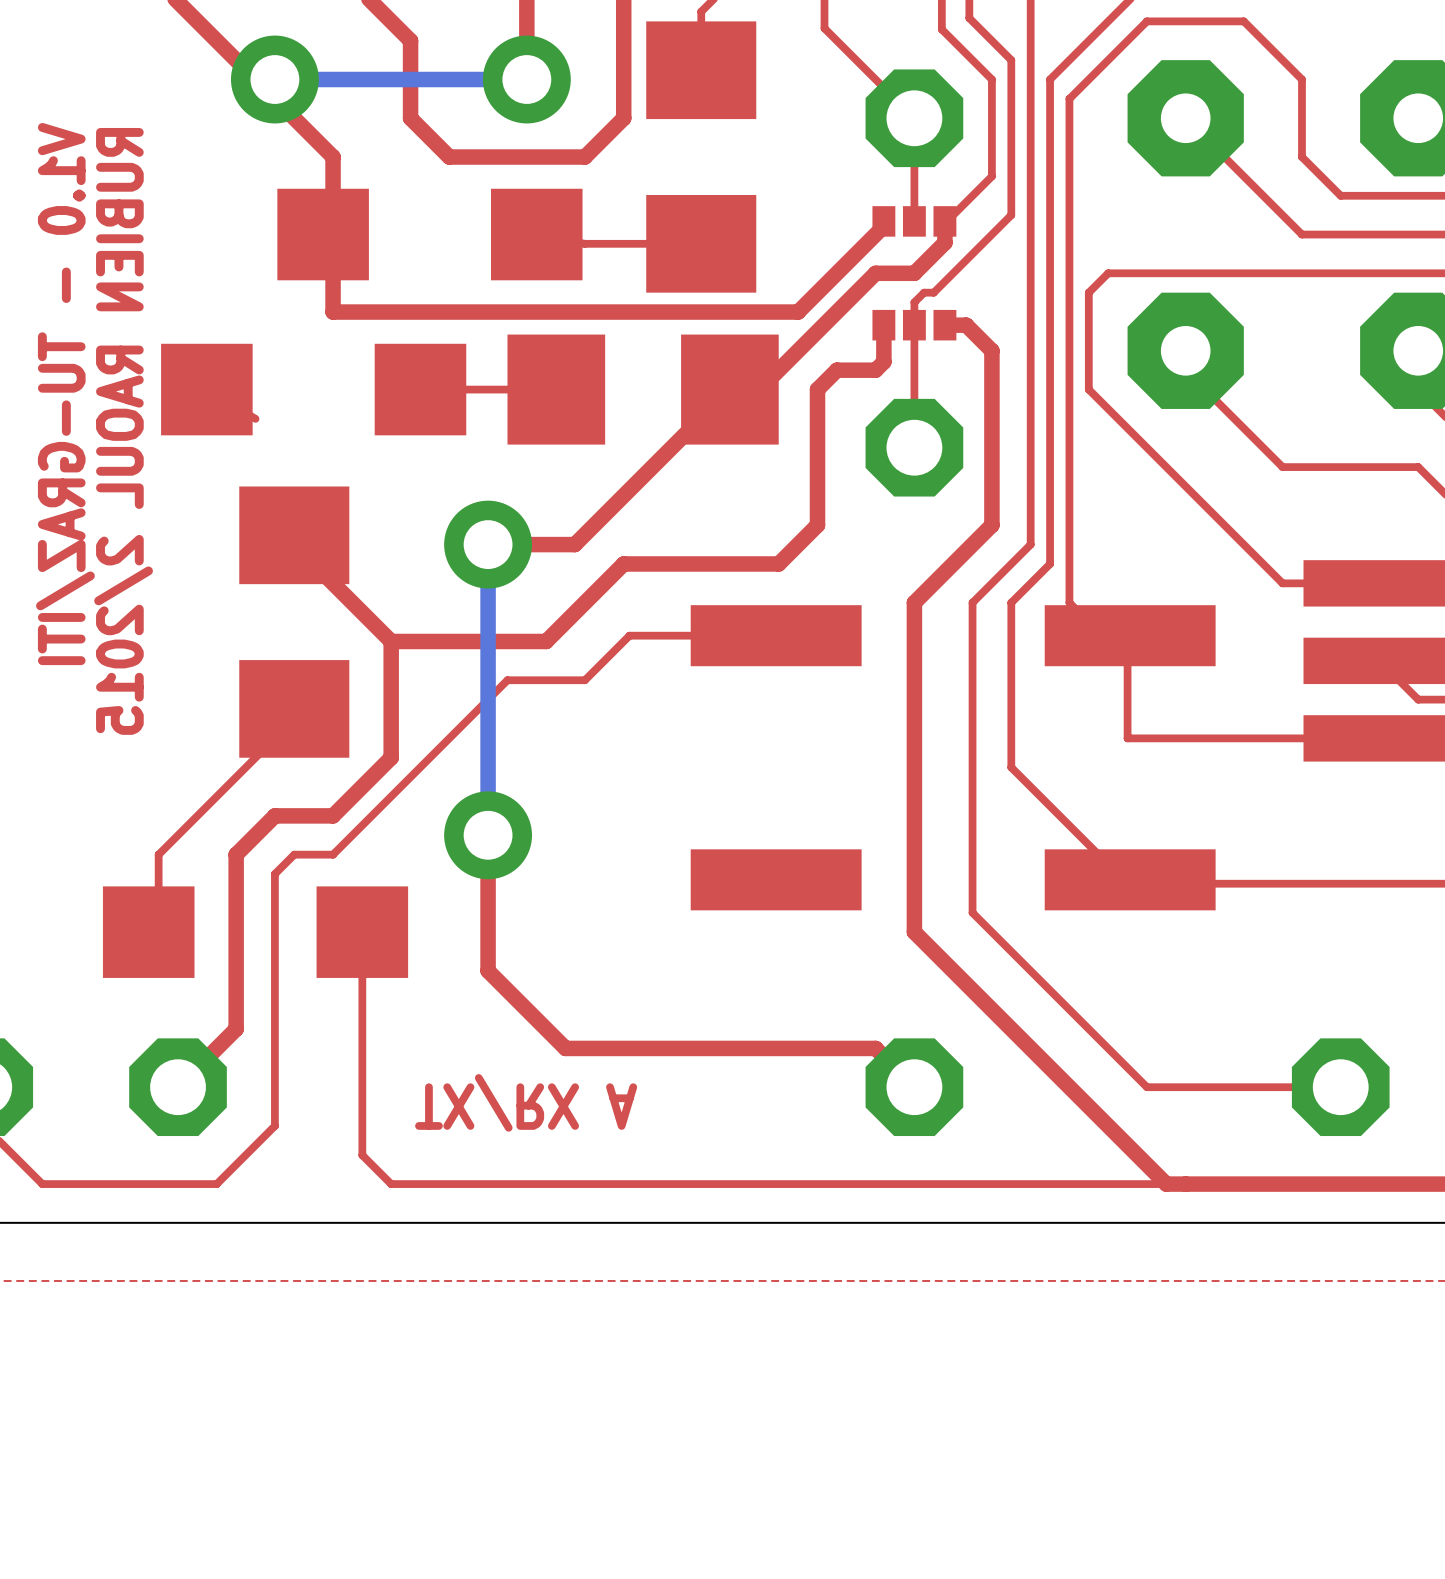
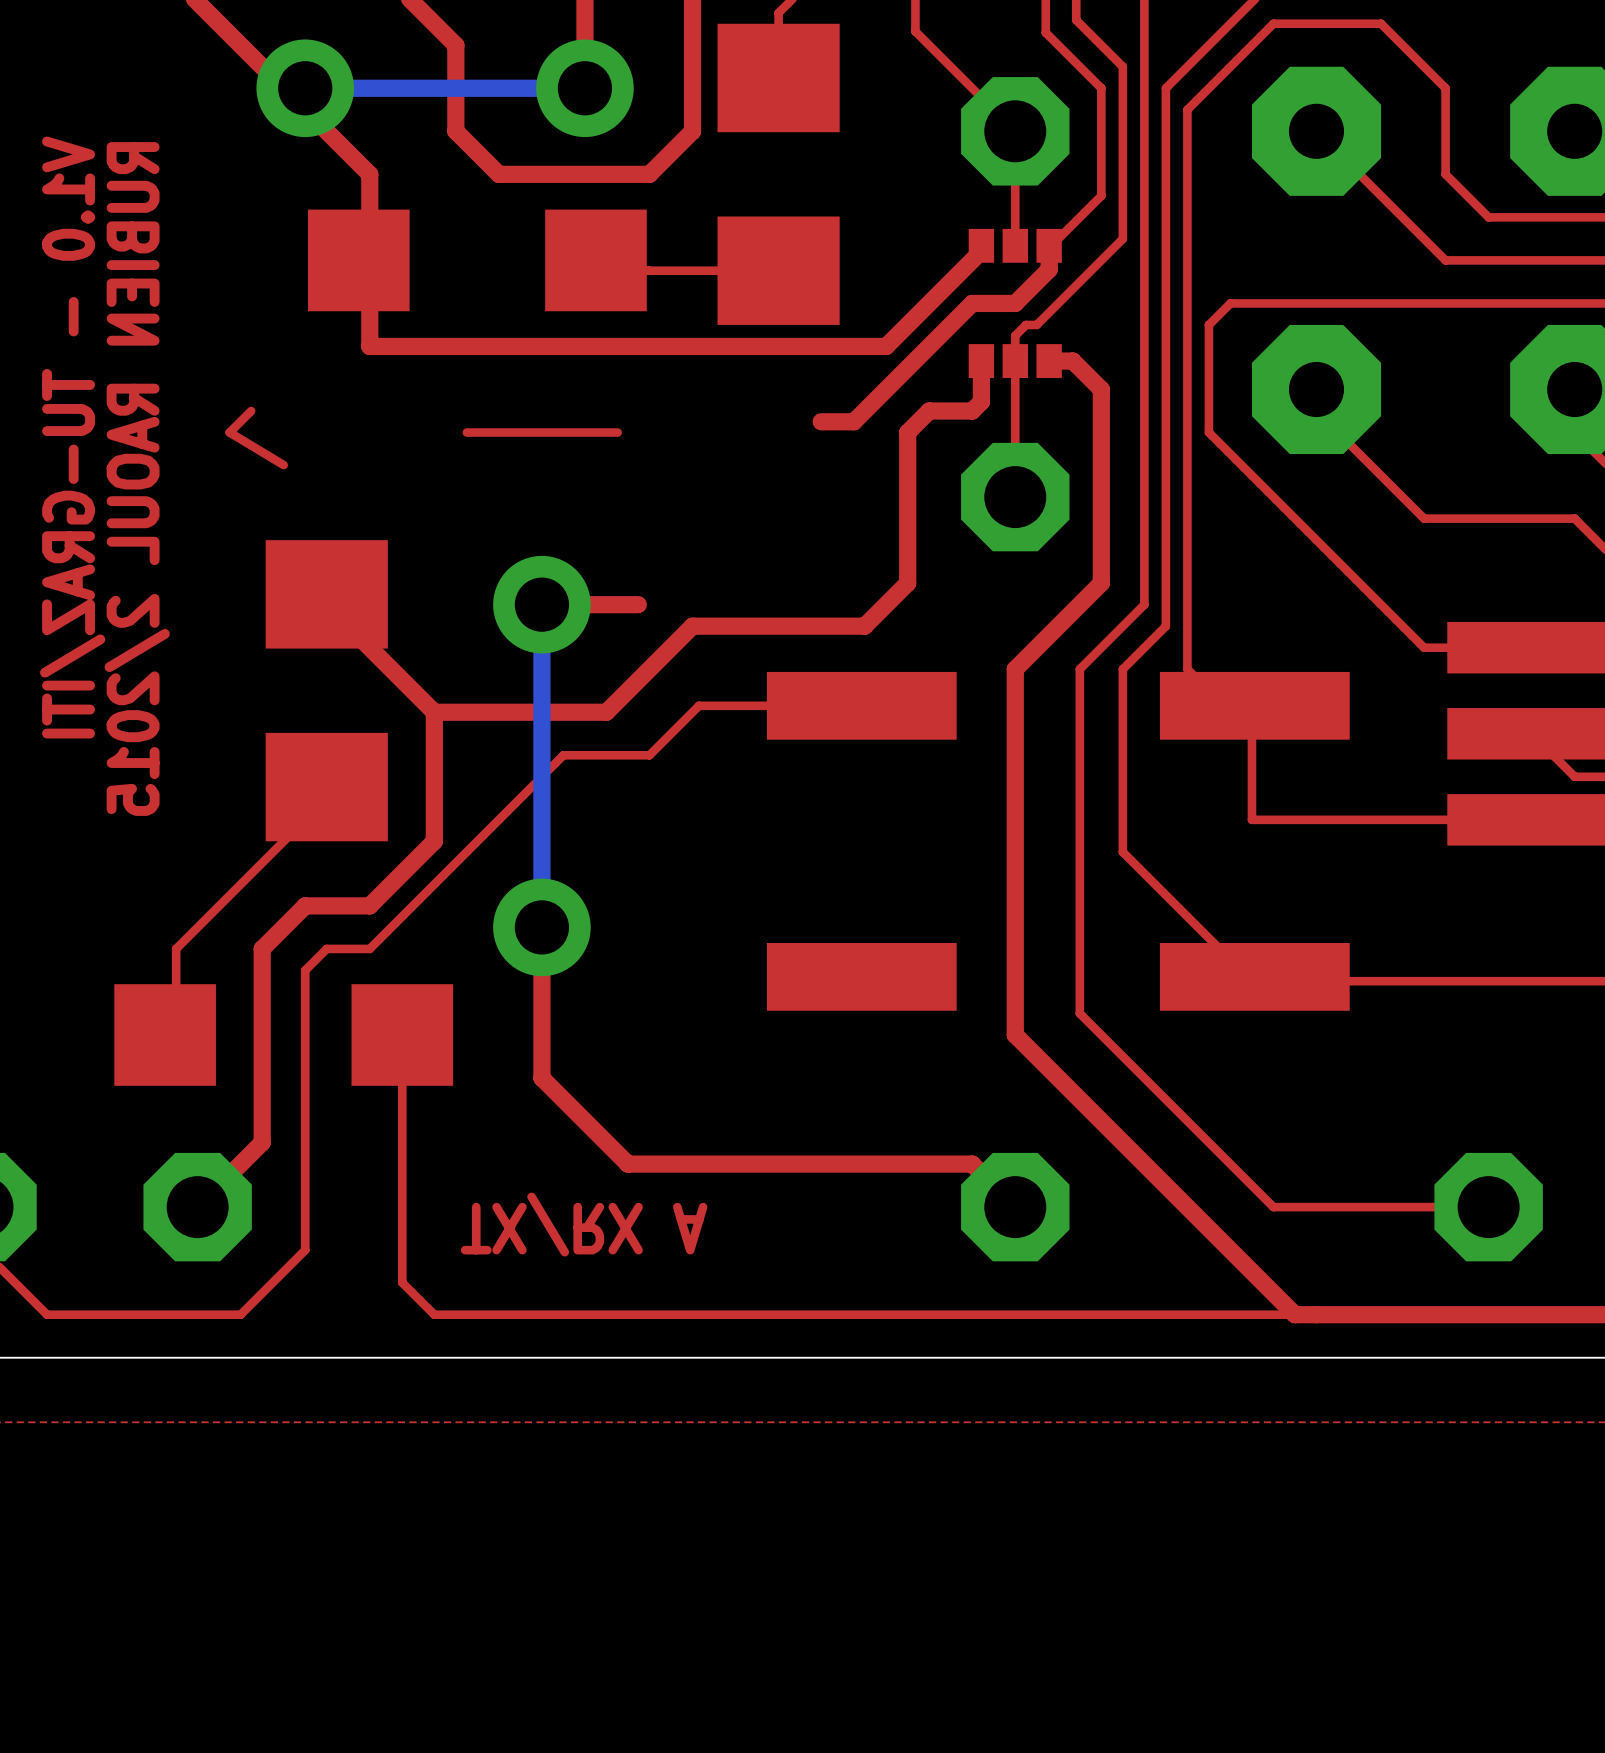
top track: (739, 379) (574, 544) -> none
part: (313, 389) -> none
part: (643, 389) -> none

